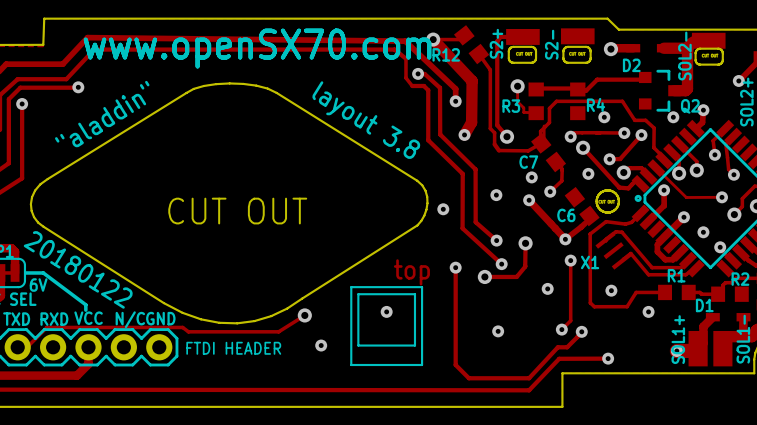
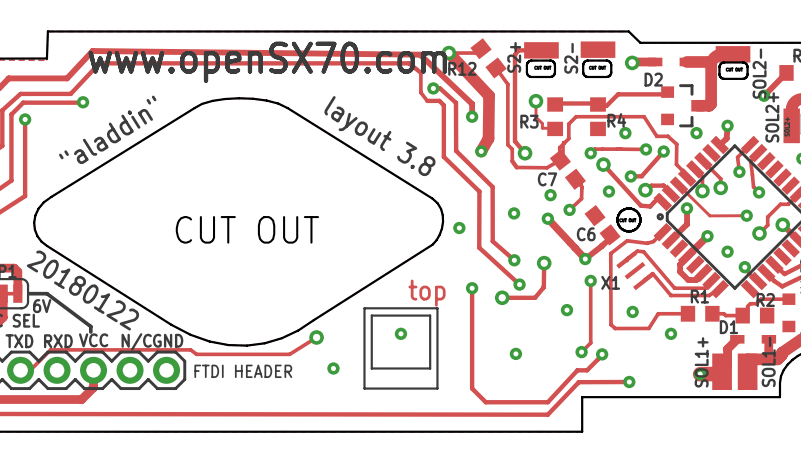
text position: SOL2- (684, 56) -> SOL2- (759, 73)
text: Q2 (690, 106) -> none

